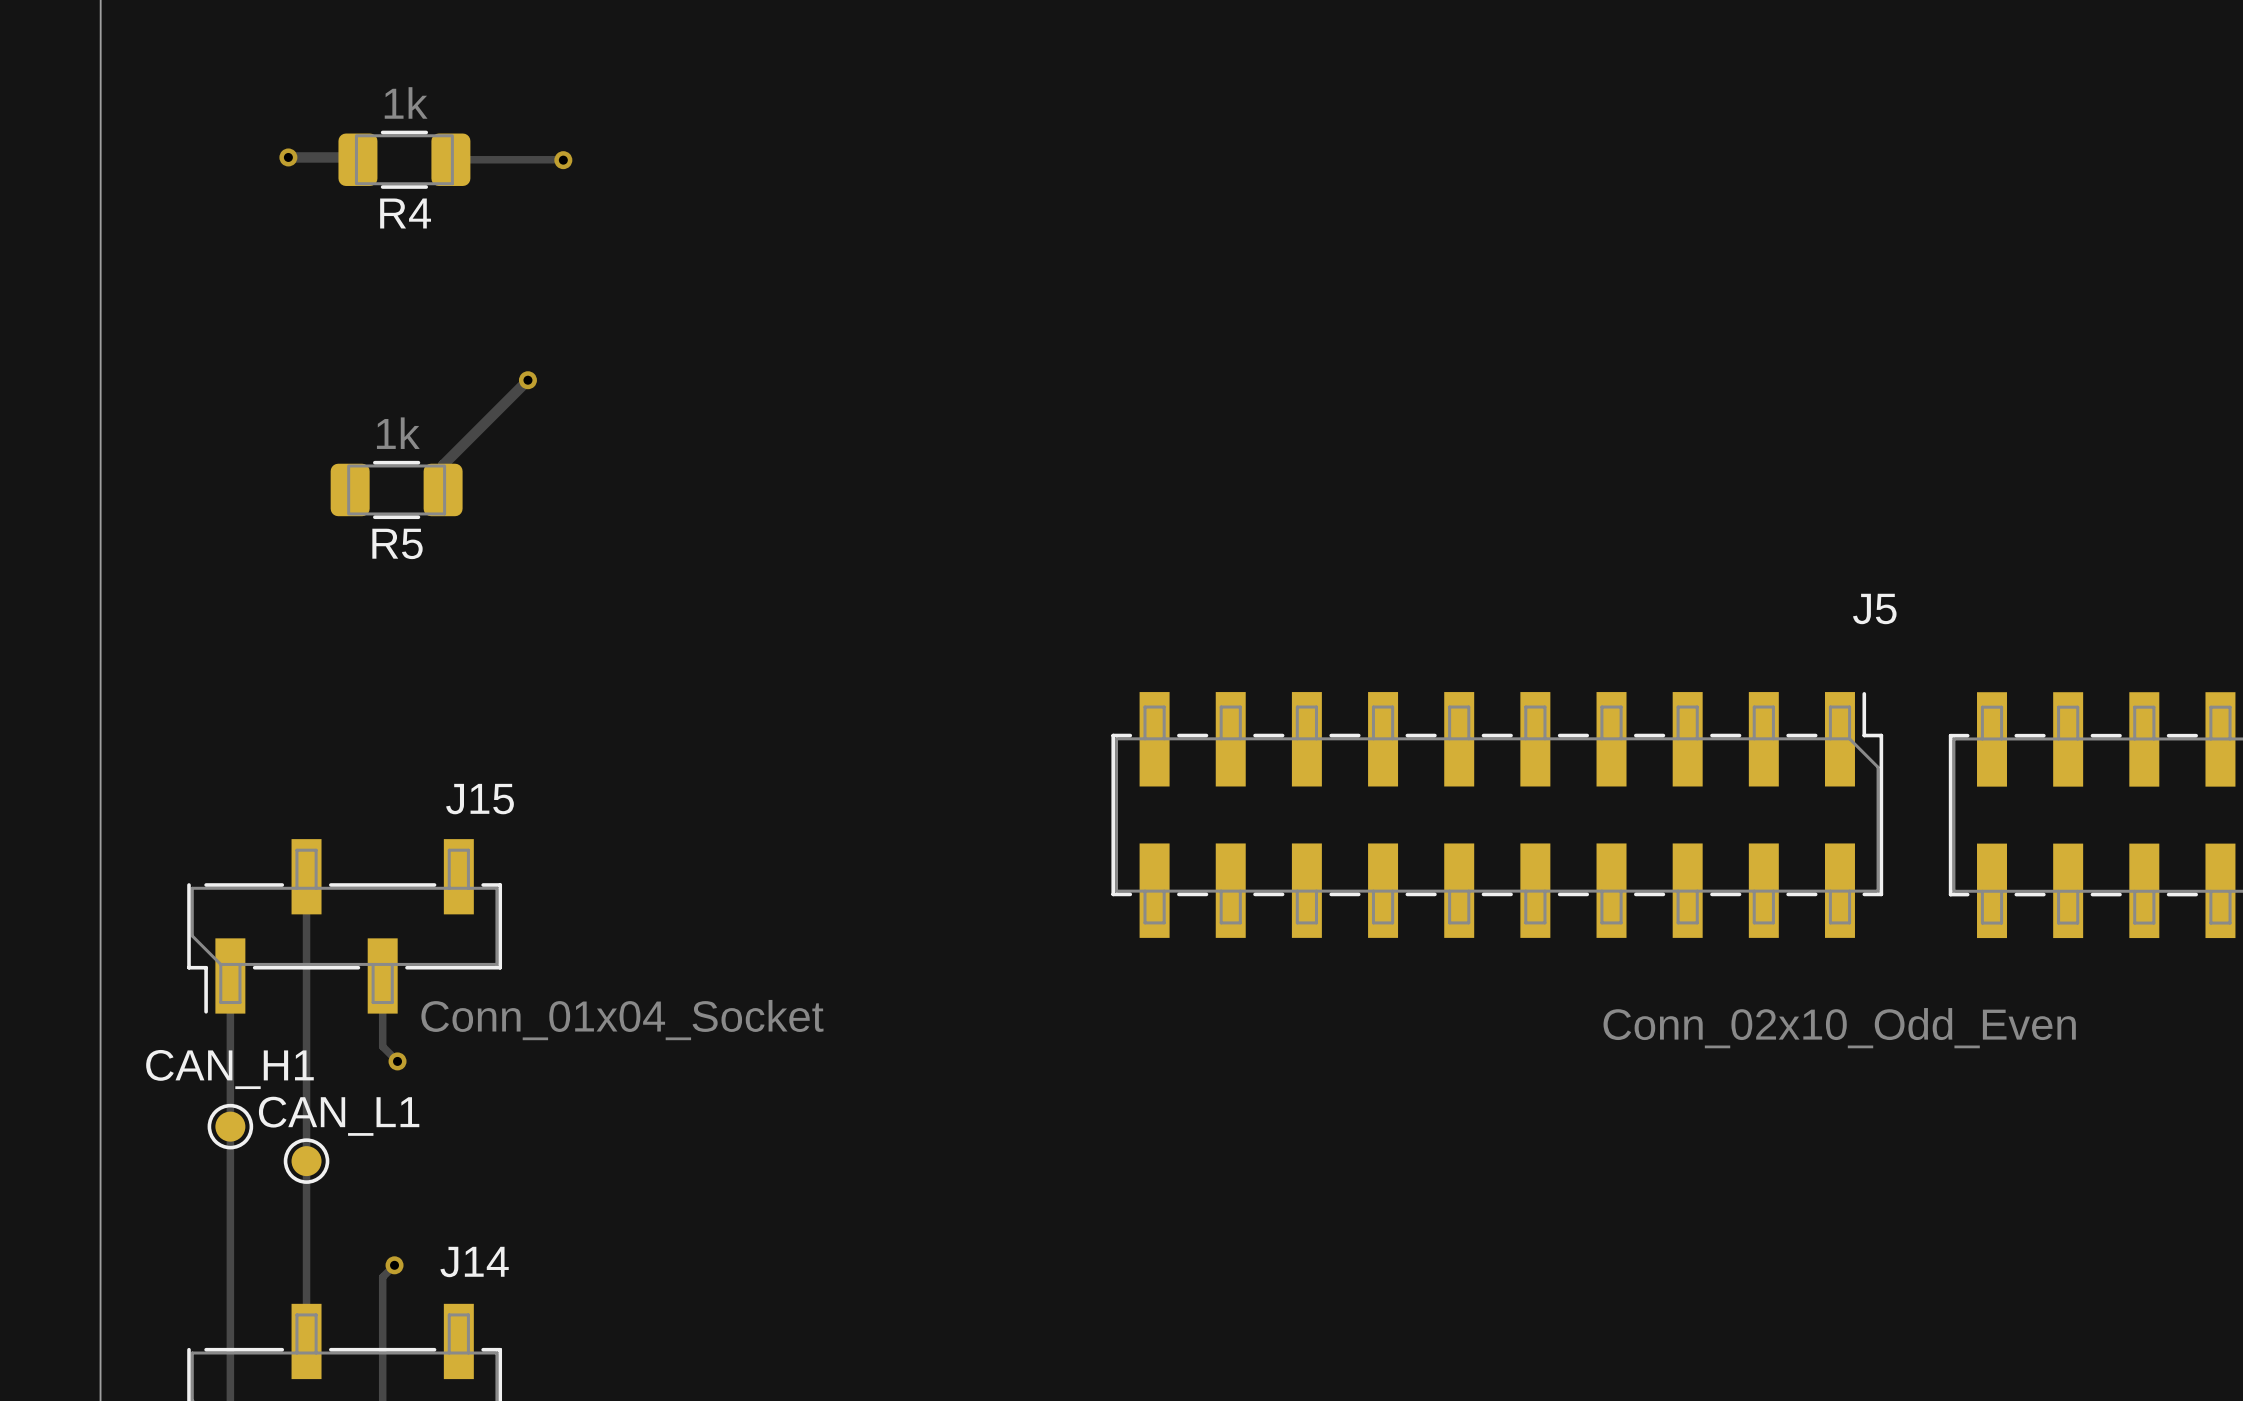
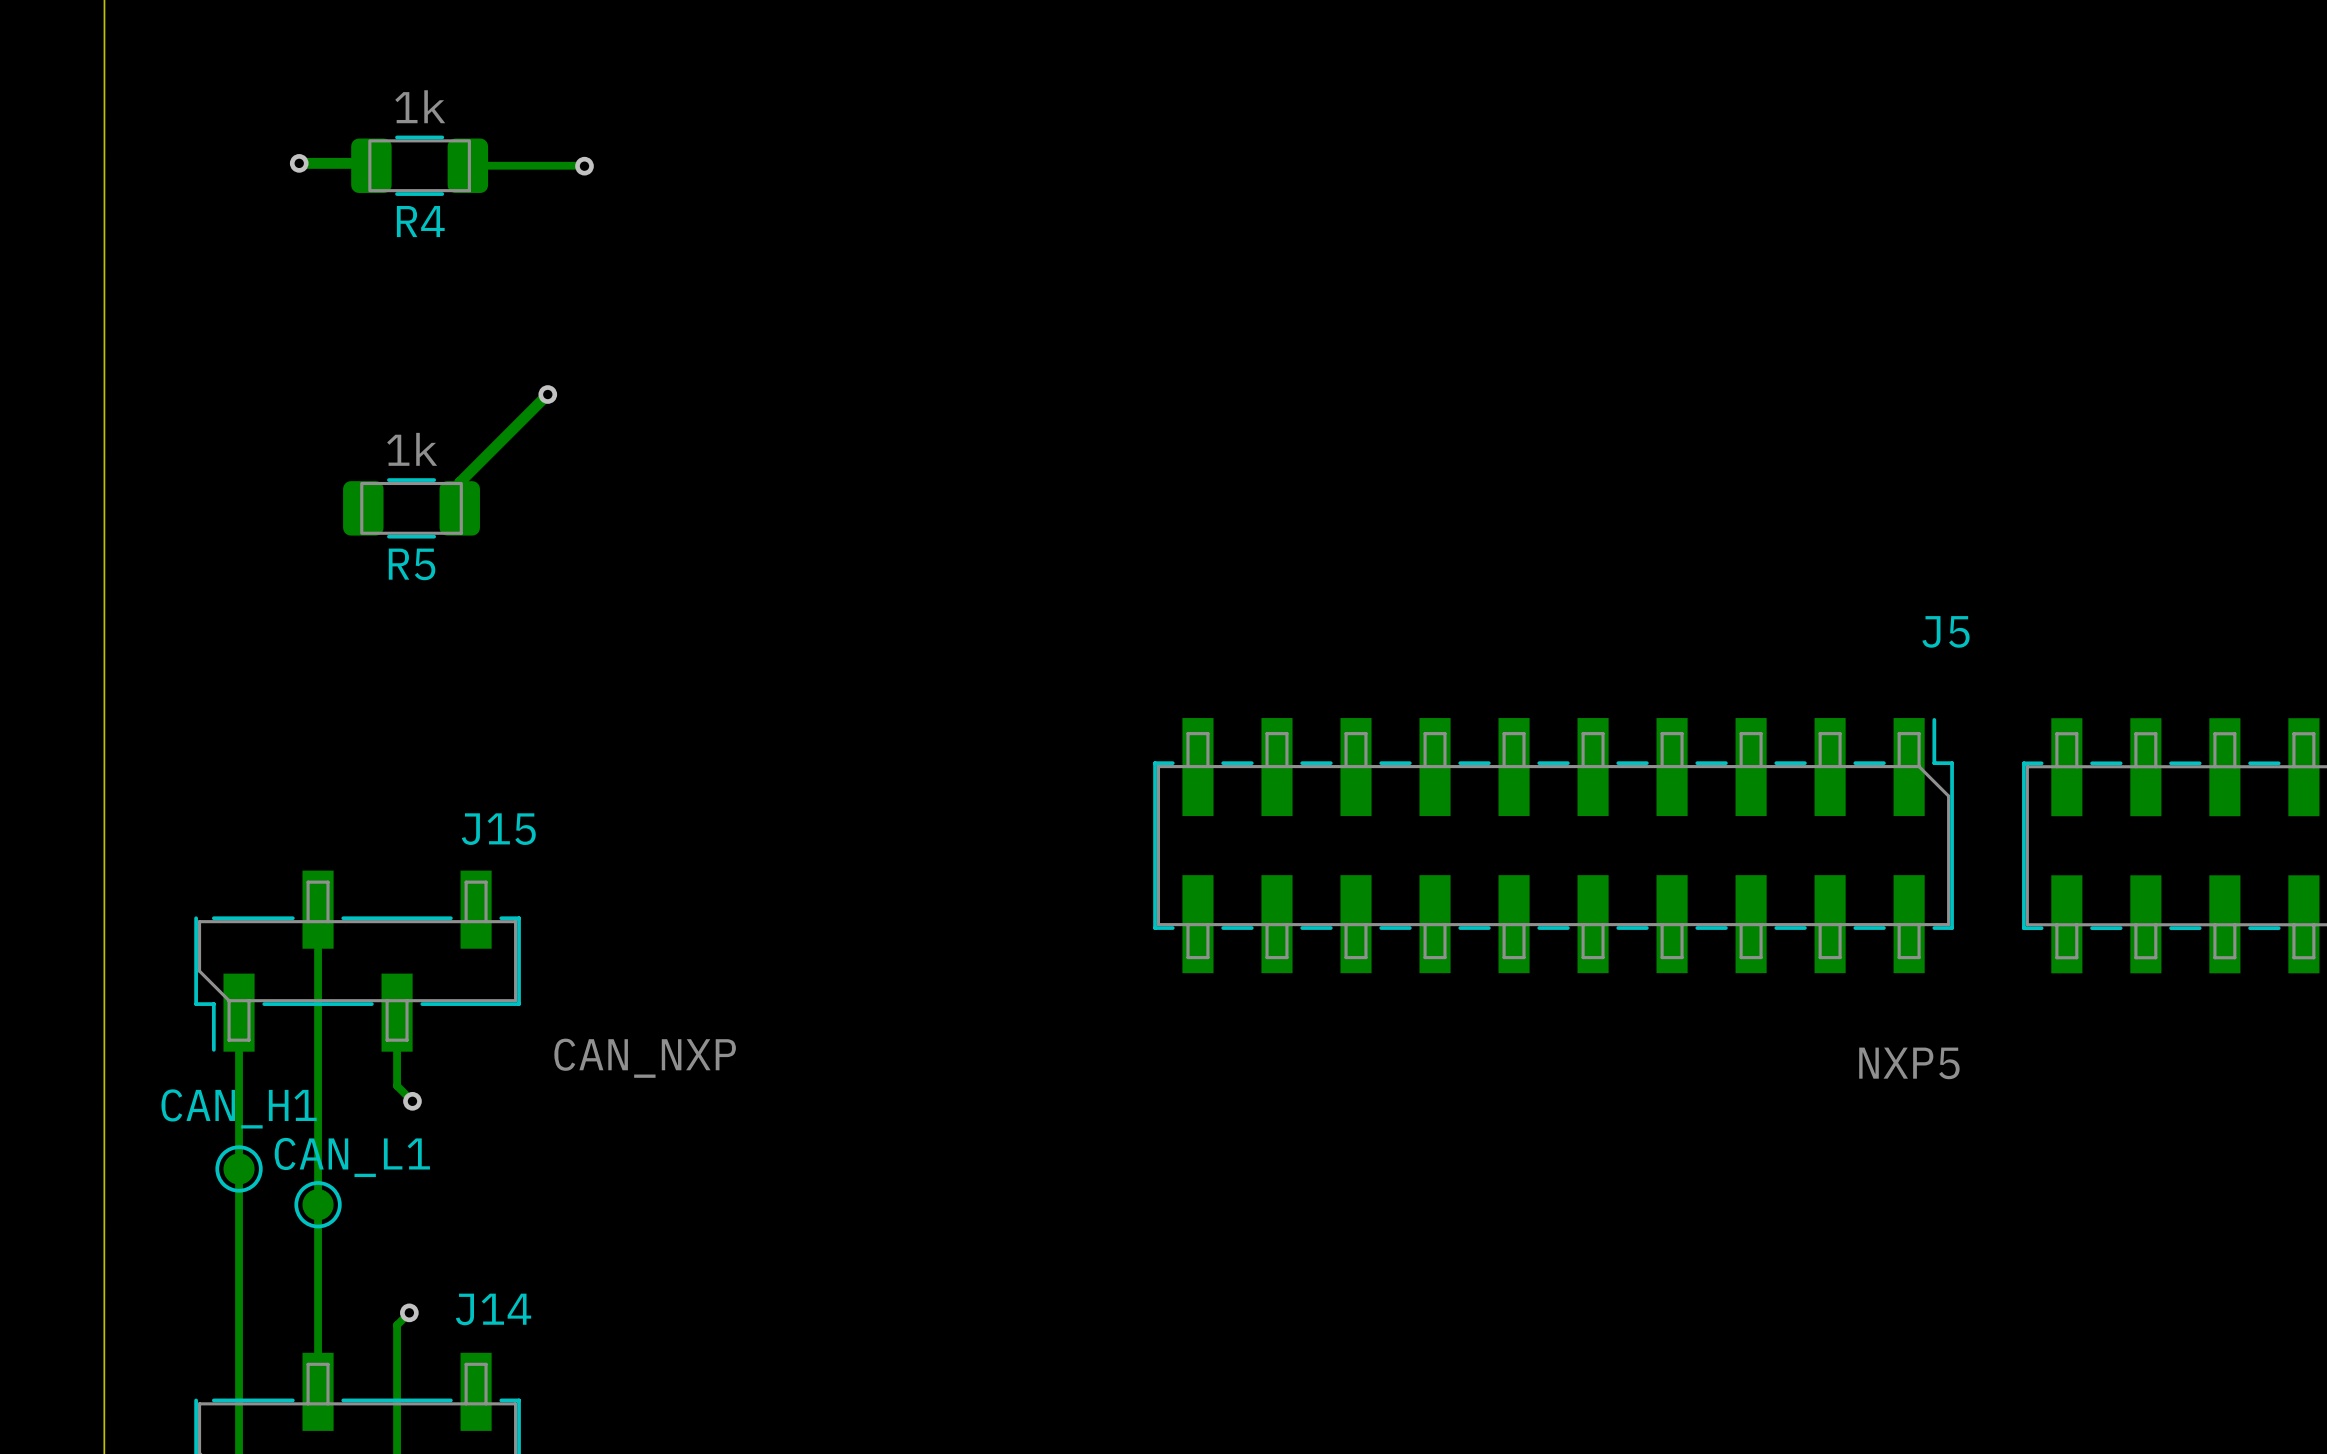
J15 value: Conn_01x04_Socket (622, 1020) -> CAN_NXP (645, 1058)
J5 value: Conn_02x10_Odd_Even (1839, 1028) -> NXP5 (1909, 1063)

